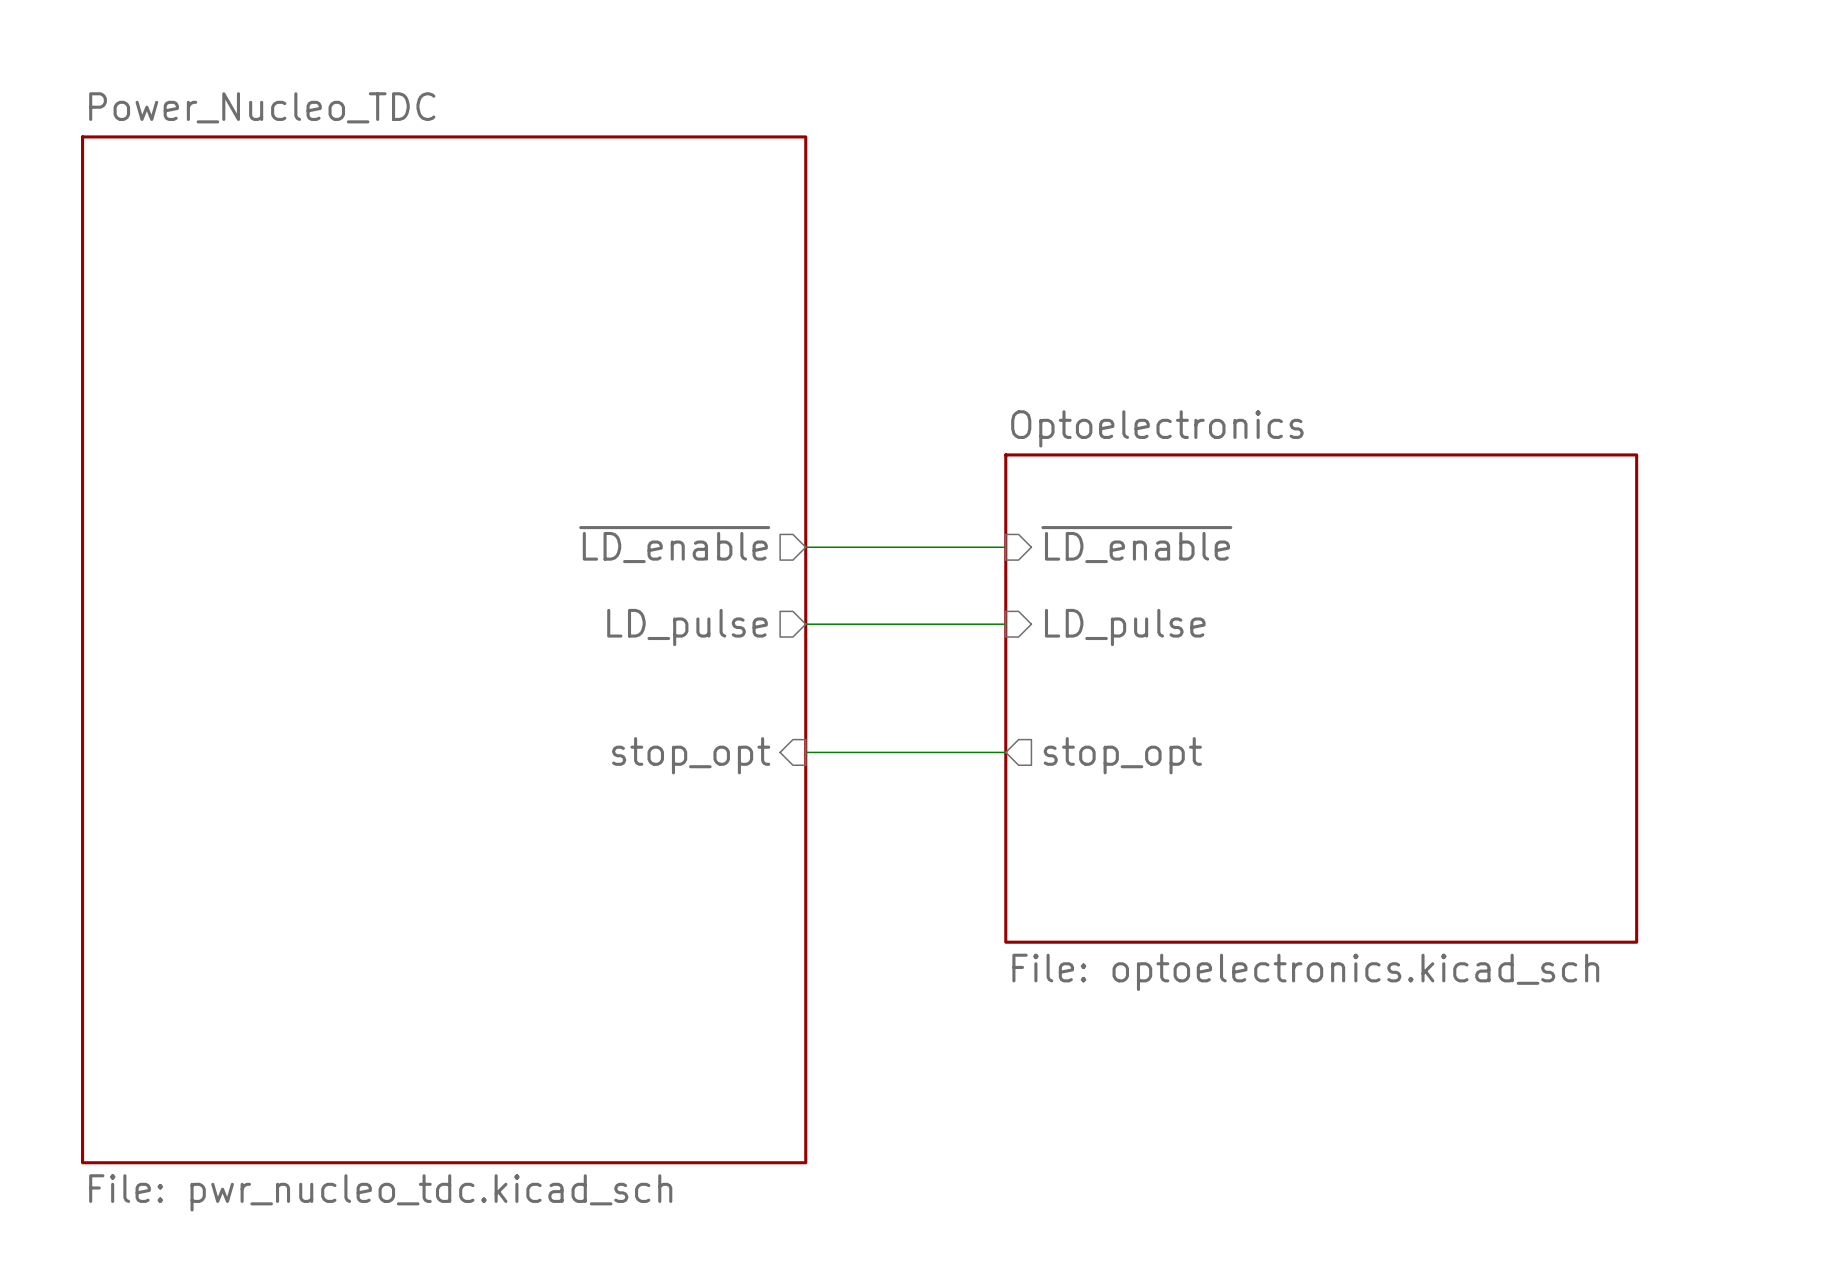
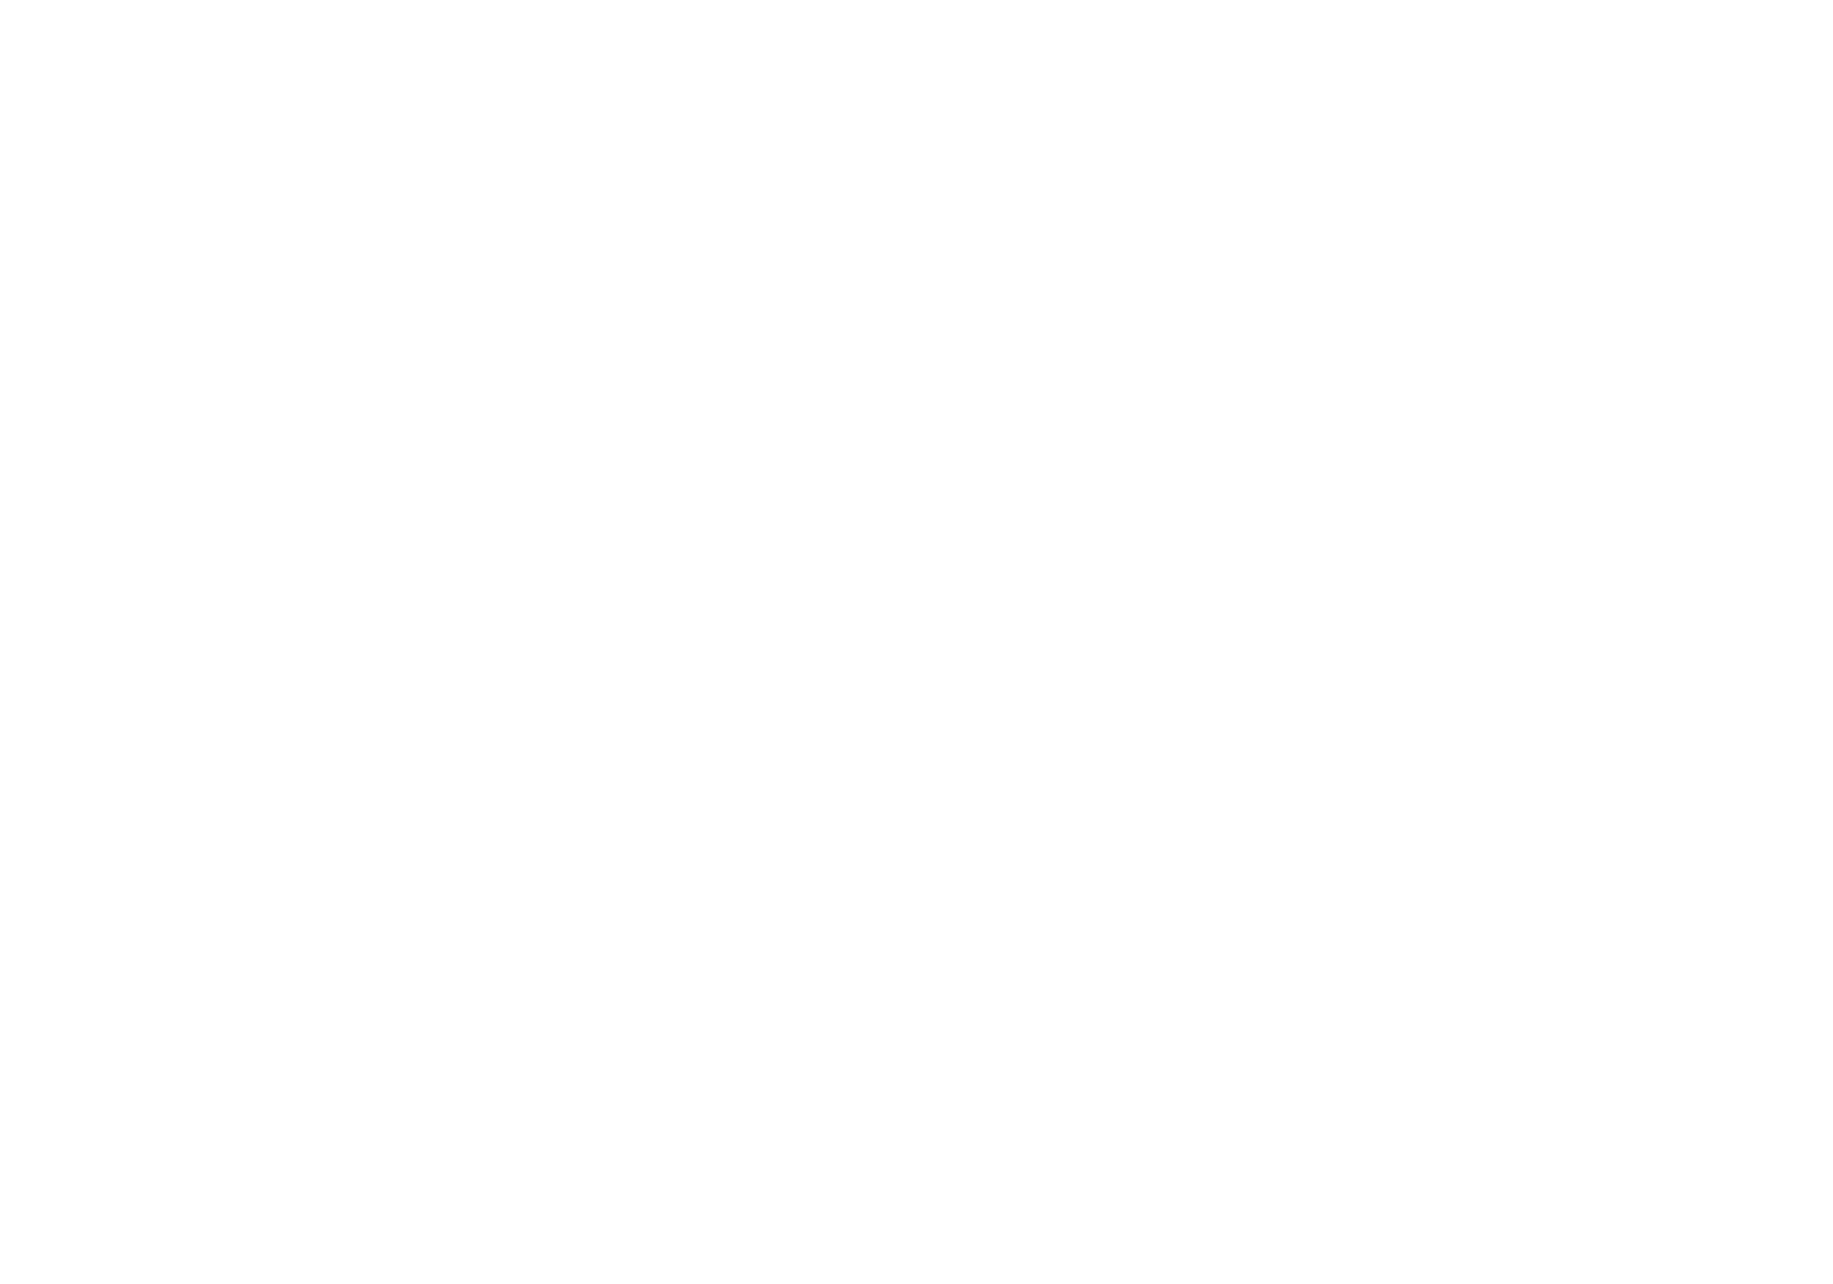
sheet pin: ~{LD_enable} (674, 544) -> none
sheet pin: ~{LD_enable} (1136, 544) -> none
wire: (805, 547) (1005, 547) -> none
wire: (805, 624) (1005, 624) -> none
sheet pin: LD_pulse (687, 627) -> none
sheet pin: LD_pulse (1125, 627) -> none
sheet Power_Nucleo_TDC: File: pwr_nucleo_tdc.kicad_sch (444, 649) -> none
sheet Optoelectronics: File: optoelectronics.kicad_sch (1321, 698) -> none
wire: (805, 752) (1005, 752) -> none
sheet pin: stop_opt (691, 755) -> none
sheet pin: stop_opt (1122, 755) -> none

